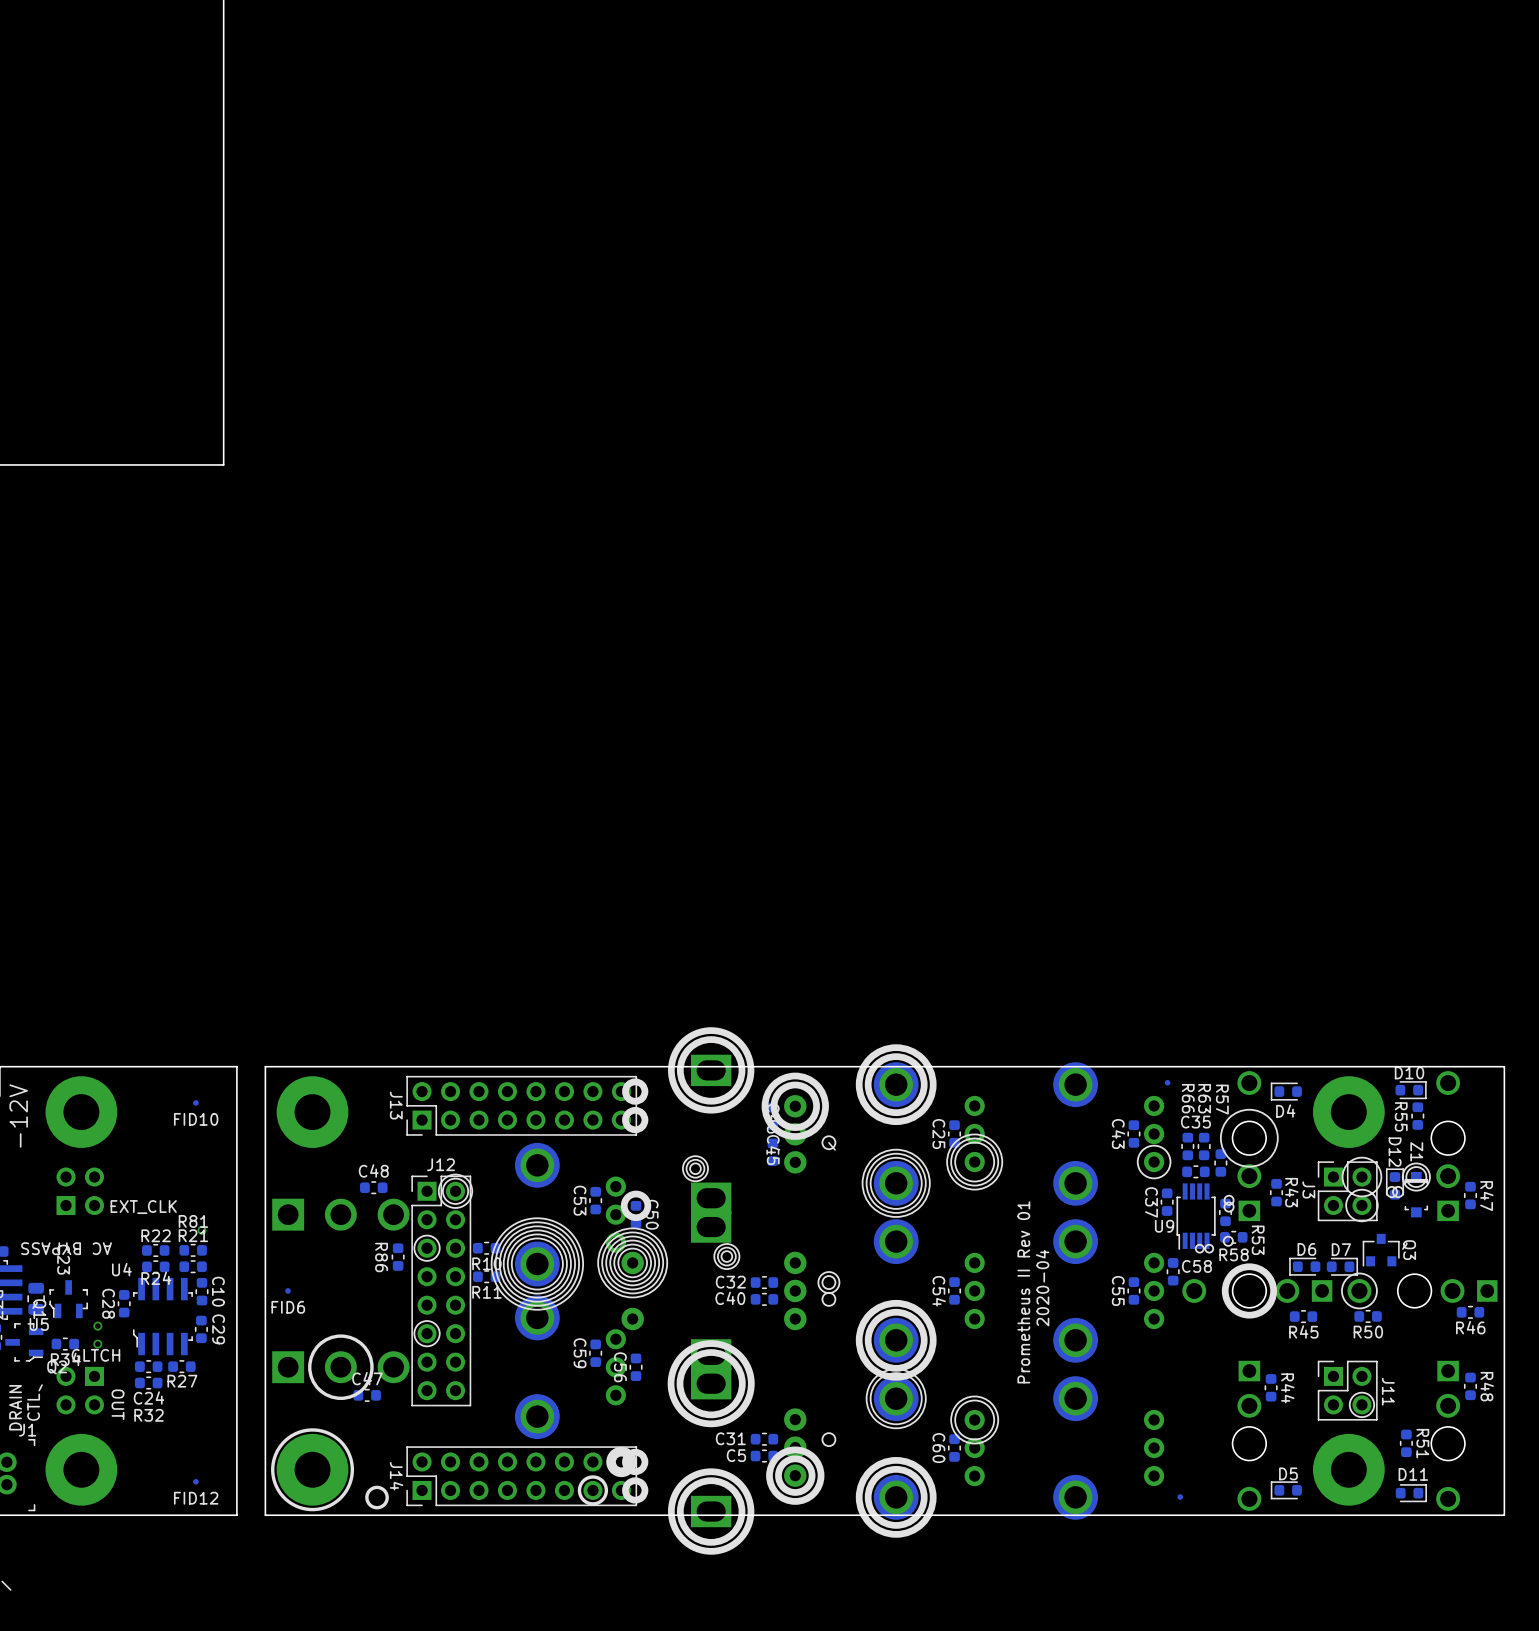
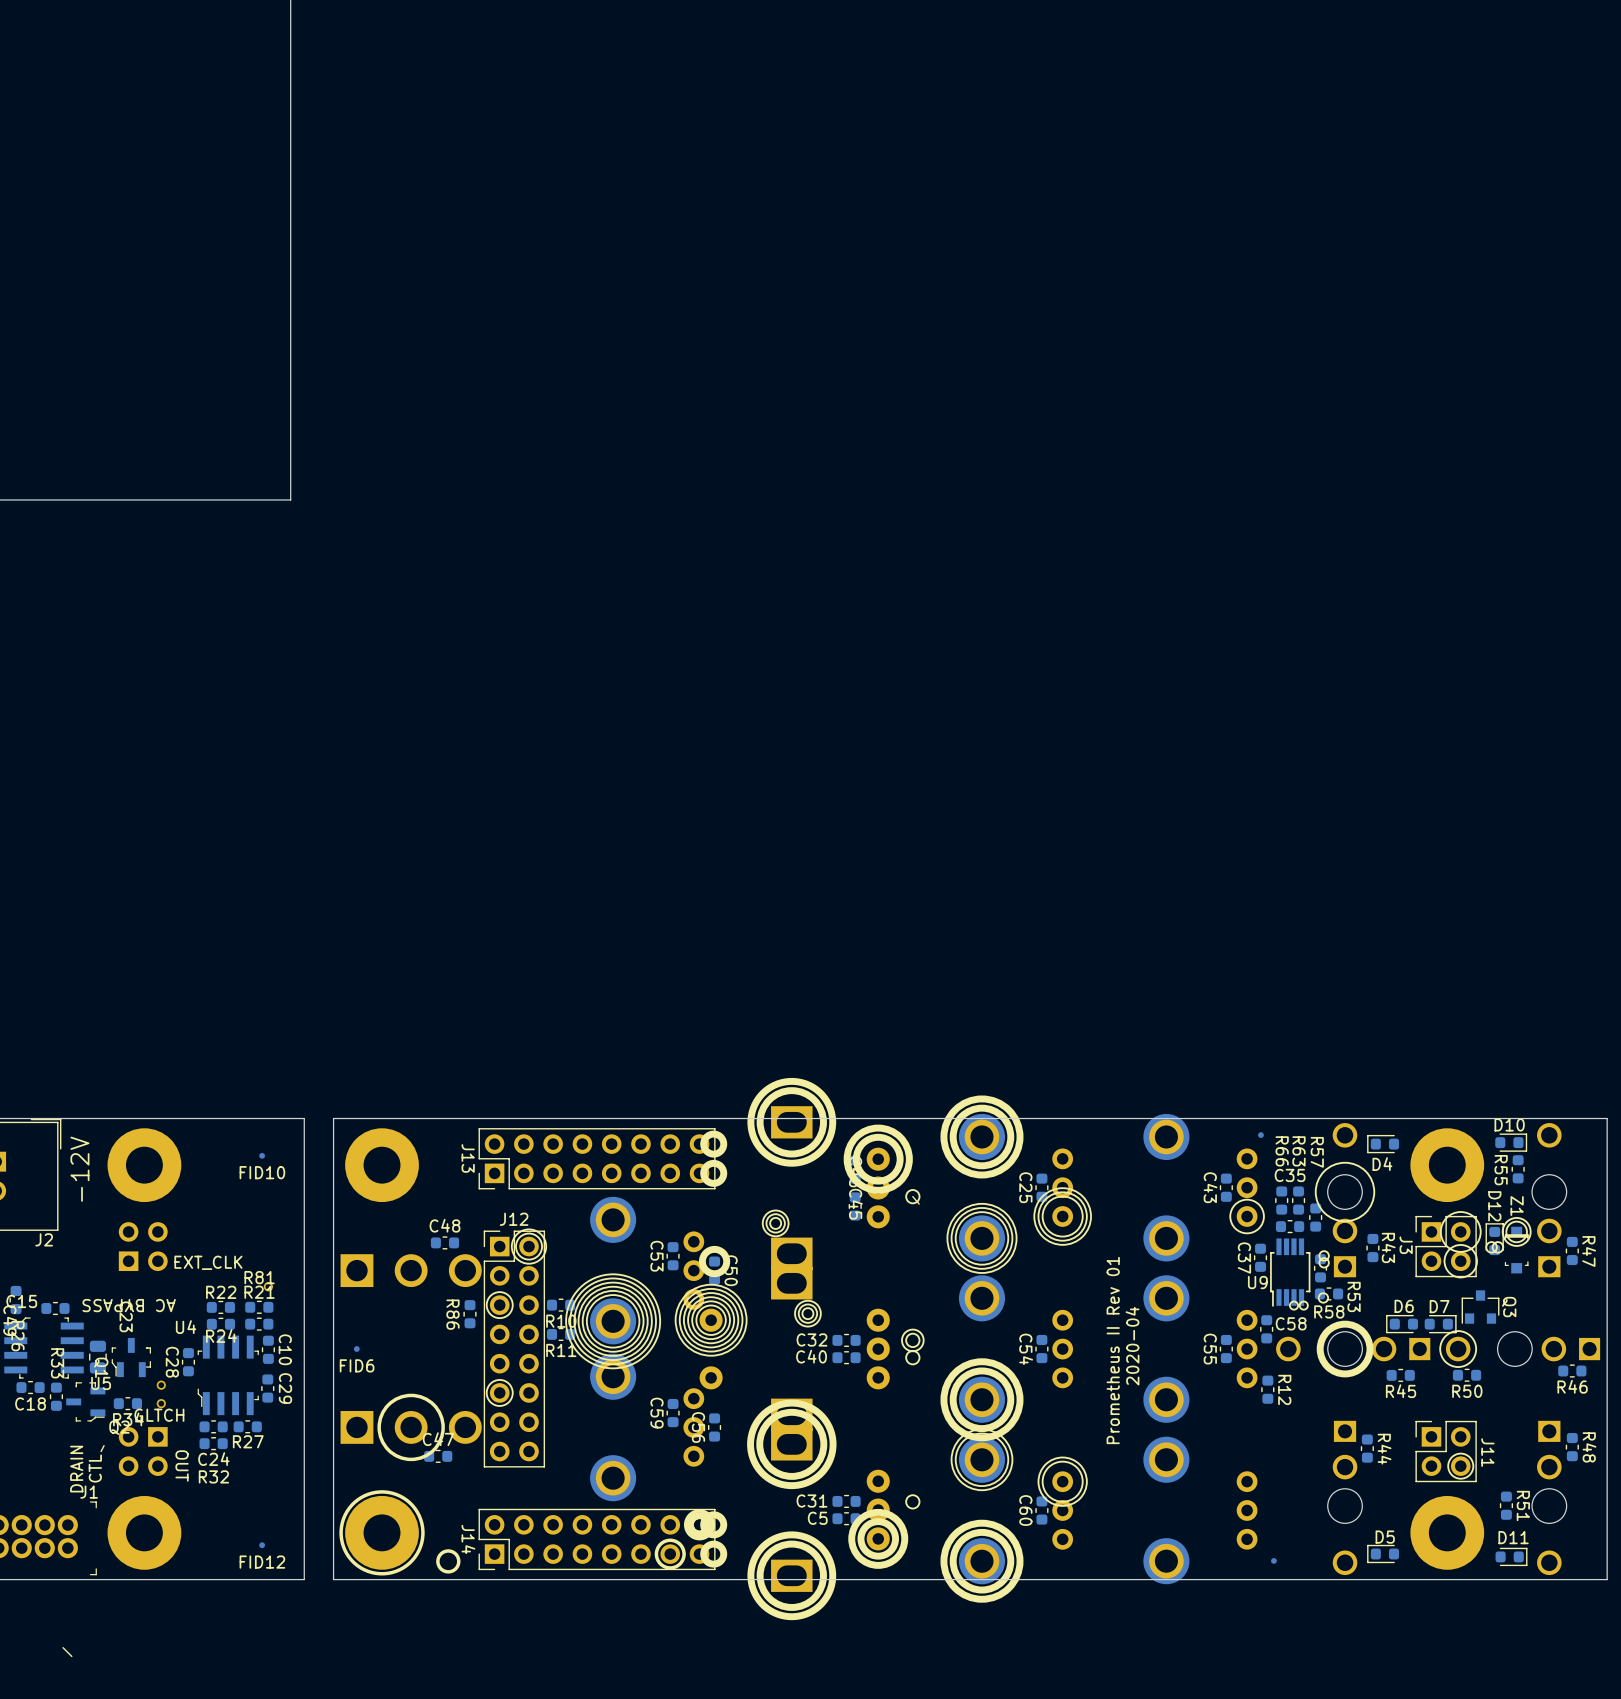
R12: none -> (1267, 1389)

